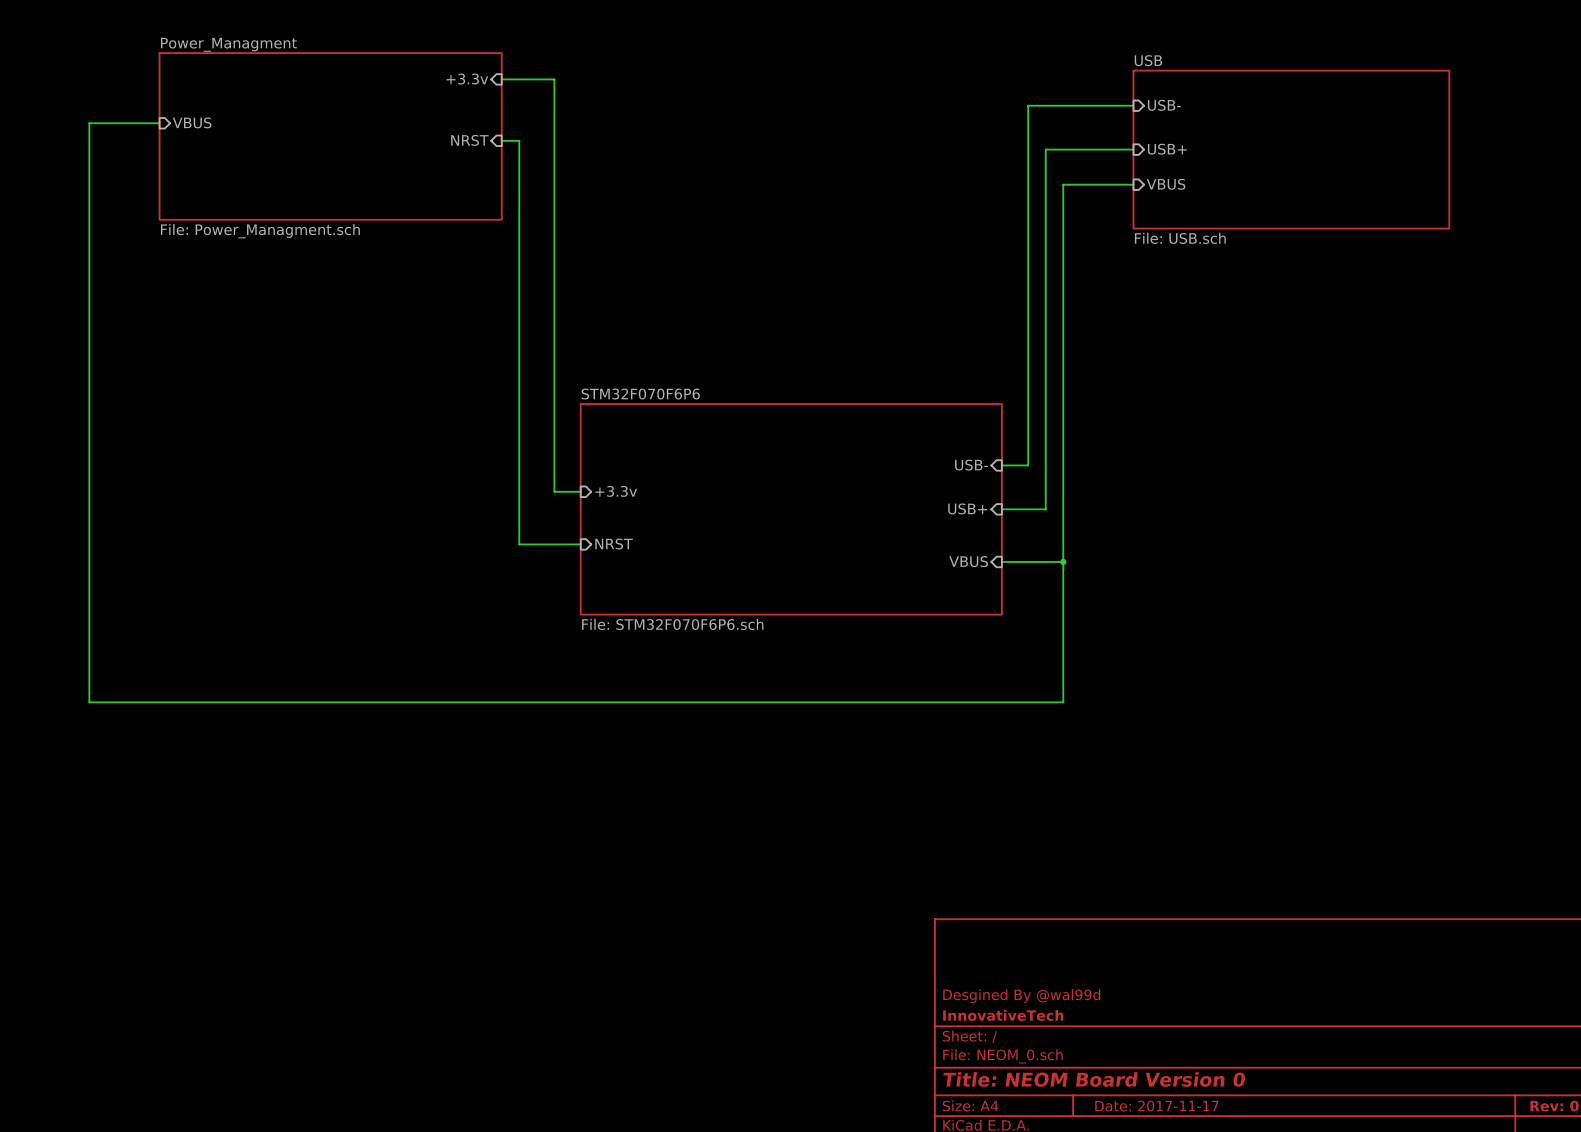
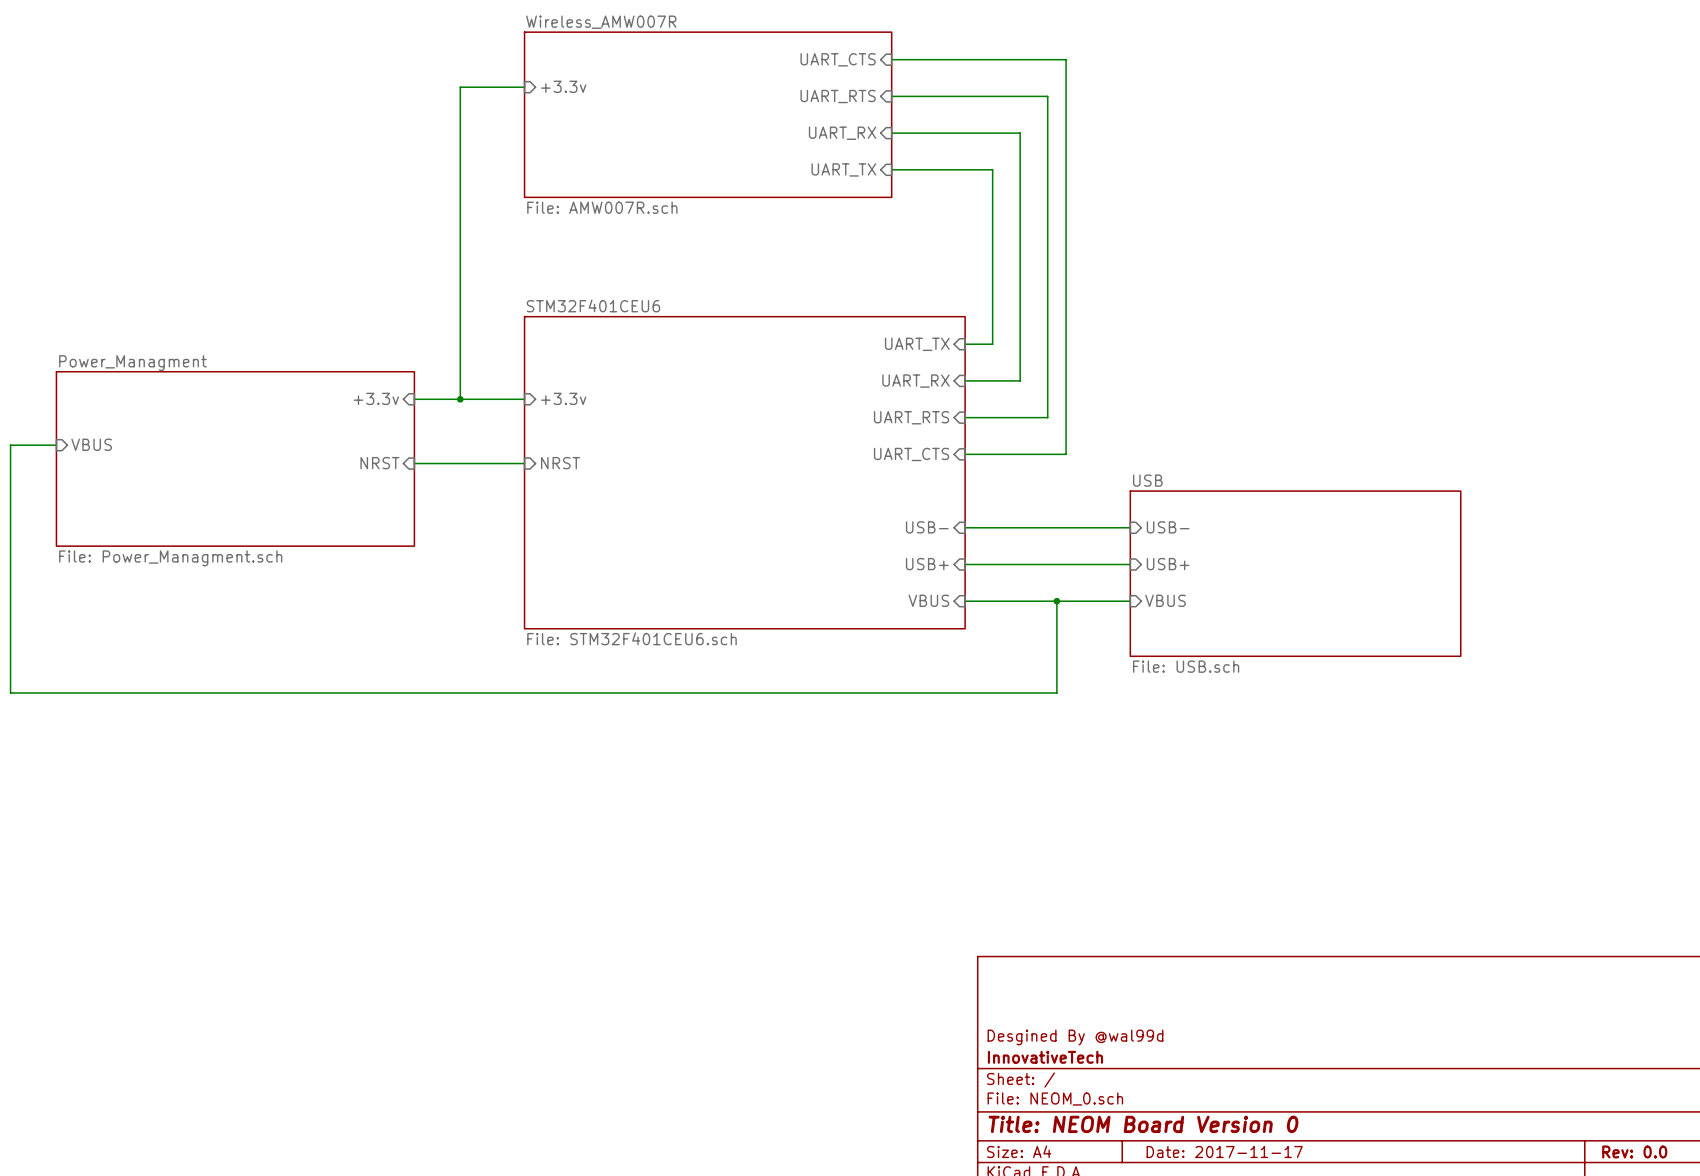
wire: none -> (891, 59) (1066, 59) (1066, 454) (965, 454)
sheet pin: none -> UART_CTS (838, 59)
sheet pin rotation: 0° (467, 79) -> 180° (563, 86)
sheet pin position: +3.3v (467, 79) -> +3.3v (563, 86)
wire: (501, 79) (554, 79) (554, 491) (580, 491) -> none
wire: none -> (524, 87) (460, 87) (460, 399)
wire: none -> (891, 96) (1047, 96) (1047, 417) (965, 417)
sheet pin: none -> UART_RTS (838, 96)
wire: (1133, 105) (1028, 105) (1028, 465) (1001, 465) -> none
sheet pin: USB- (1164, 105) -> none
sheet Wireless_AMW007R: none -> File: AMW007R.sch (708, 114)
sheet pin: VBUS (192, 122) -> none
wire: (159, 123) (89, 123) (89, 702) (1063, 702) (1063, 184) (1133, 184) -> none
wire: none -> (891, 133) (1020, 133) (1020, 380) (965, 380)
sheet pin: none -> UART_RX (842, 133)
sheet Power_Managment: File: Power_Managment.sch (330, 136) -> none
sheet pin: NRST (469, 140) -> none
wire: (501, 140) (519, 140) (519, 544) (580, 544) -> none
wire: (1133, 149) (1045, 149) (1045, 509) -> (1130, 527) (1093, 527)
sheet pin: USB+ (1167, 149) -> none
sheet USB: File: USB.sch (1291, 149) -> none
wire: none -> (891, 169) (992, 169) (992, 344) (965, 344)
sheet pin: none -> UART_TX (843, 169)
sheet pin: VBUS (1166, 184) -> none
sheet pin: none -> UART_TX (917, 344)
sheet pin: none -> UART_RX (916, 381)
sheet pin: none -> +3.3v (376, 398)
wire: none -> (414, 399) (524, 399)
junction: none -> (460, 399)
sheet pin: none -> +3.3v (563, 398)
sheet pin: none -> UART_RTS (911, 417)
sheet pin: none -> VBUS (91, 444)
wire: none -> (56, 445) (10, 445) (10, 692) (1056, 692) (1056, 601)
sheet pin: none -> UART_CTS (911, 454)
sheet Power_Managment: none -> File: Power_Managment.sch (235, 458)
sheet pin: none -> NRST (379, 463)
wire: none -> (414, 463) (524, 463)
sheet pin: none -> NRST (560, 463)
sheet STM32F401CEU6: none -> File: STM32F401CEU6.sch (744, 472)
sheet pin: USB- (971, 465) -> none
sheet pin: +3.3v (616, 491) -> none
sheet pin: none -> USB- (927, 527)
sheet pin: USB+ (967, 508) -> none
sheet pin: none -> USB- (1168, 527)
sheet STM32F070F6P6: File: STM32F070F6P6.sch (791, 509) -> none
wire: none -> (965, 527) (1047, 527)
sheet pin: NRST (614, 544) -> none
sheet pin: none -> USB+ (927, 564)
wire: none -> (965, 564) (1130, 564)
sheet pin: none -> USB+ (1168, 564)
sheet USB: none -> File: USB.sch (1295, 573)
sheet pin: VBUS (968, 561) -> none
wire: (1001, 561) (1063, 561) -> none
junction: (1063, 561) -> none
sheet pin: none -> VBUS (928, 600)
wire: none -> (965, 601) (1130, 601)
junction: none -> (1056, 601)
sheet pin: none -> VBUS (1165, 600)

